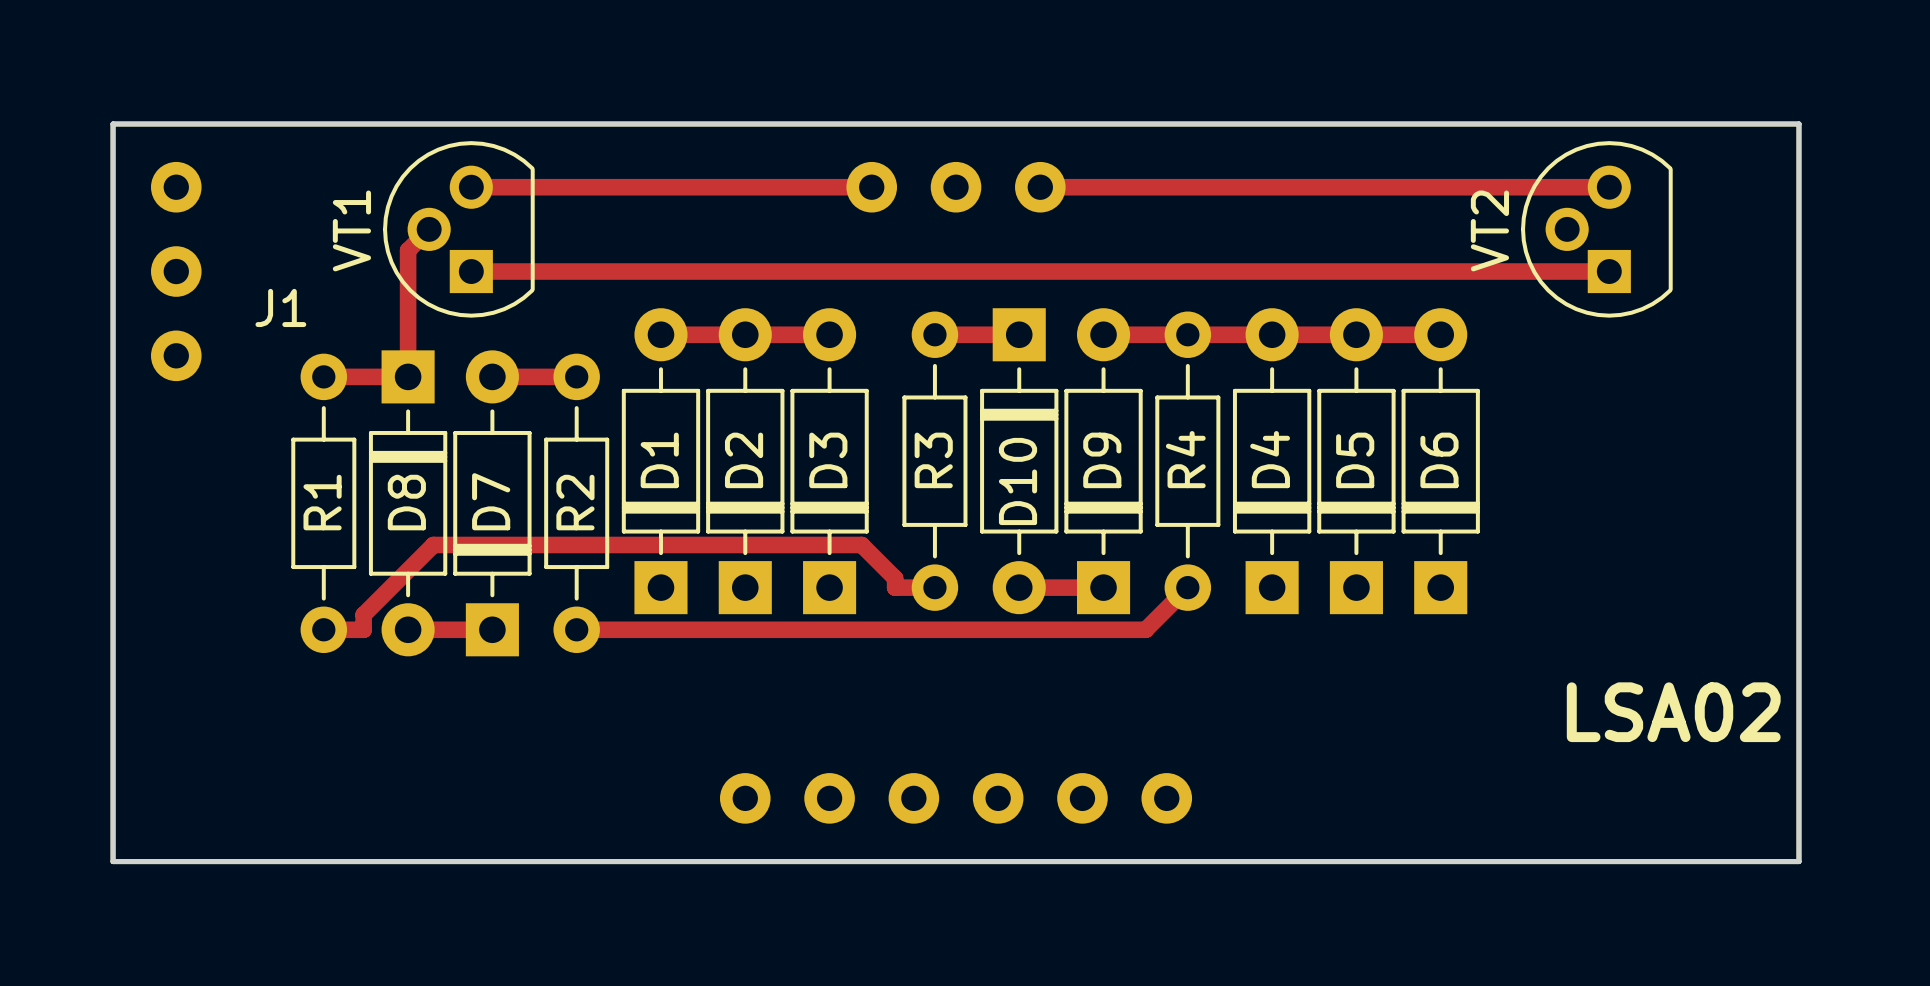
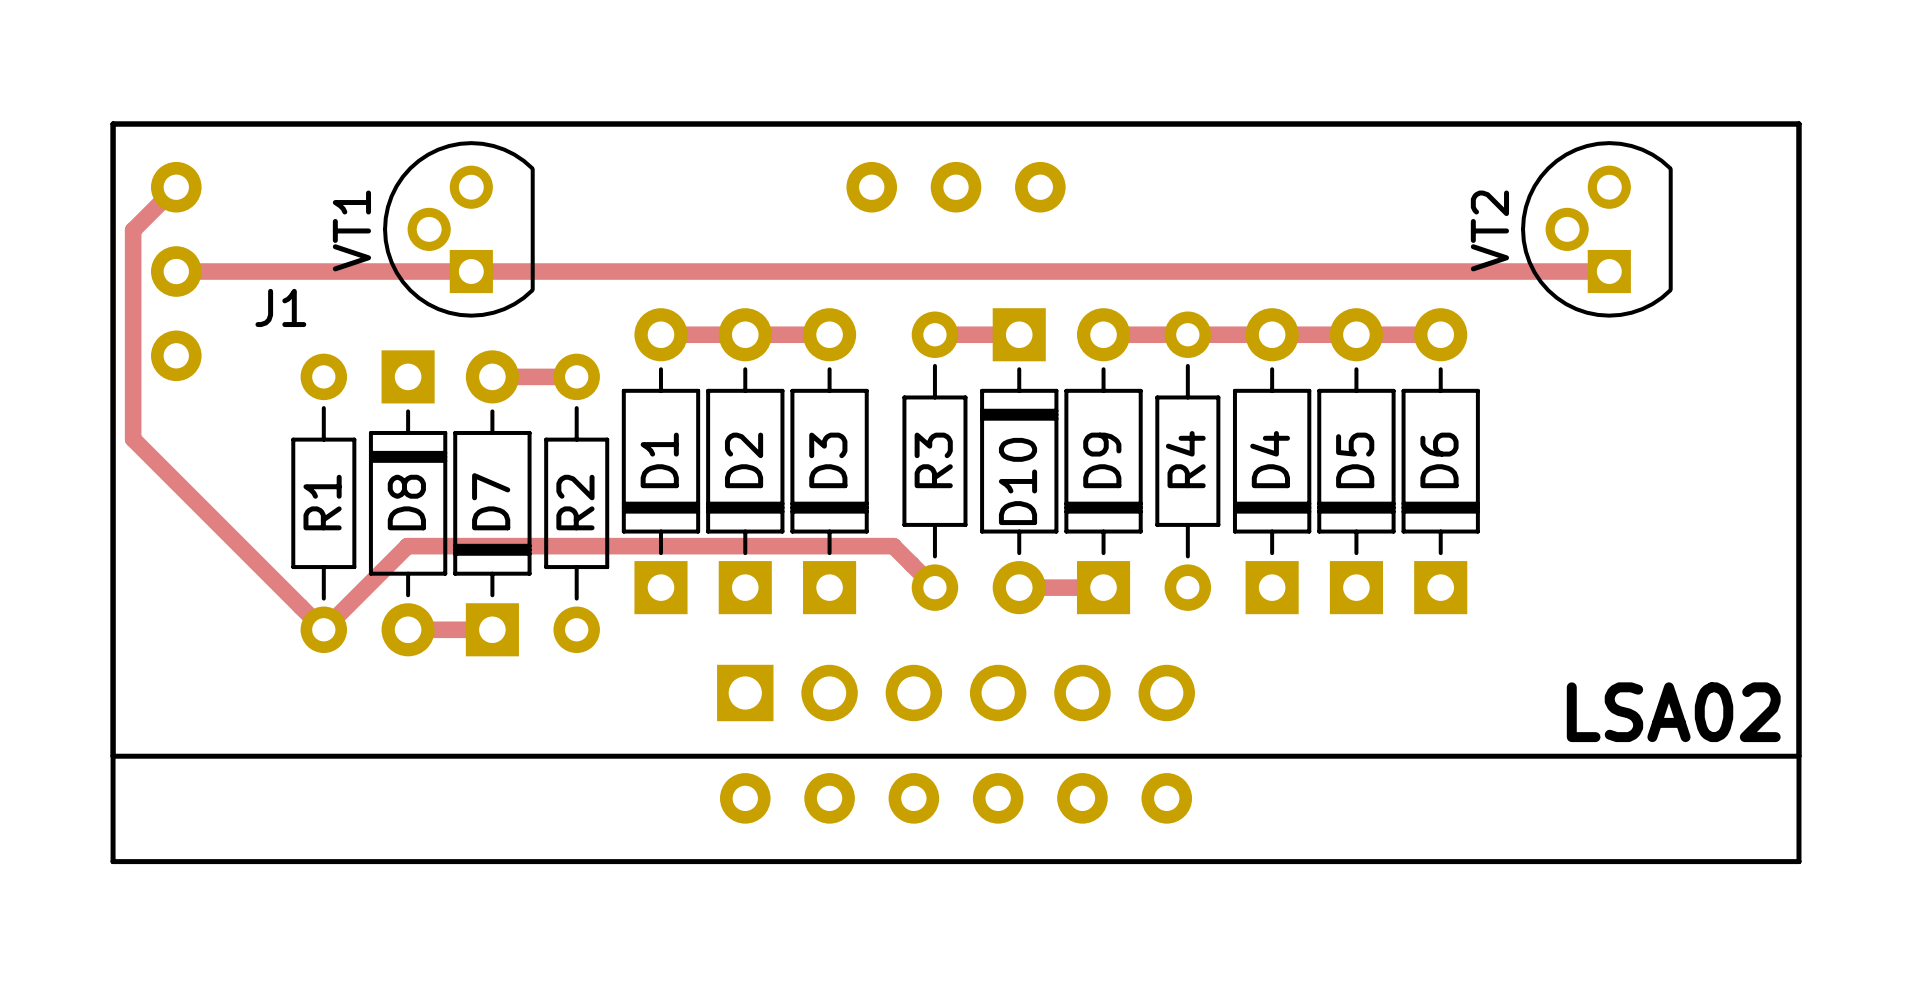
track: (471, 187) (871, 187) -> none
track: (1040, 187) (1609, 187) -> none
track: (429, 229) (408, 250) (408, 376) (323, 376) -> none
track: none -> (176, 271) (471, 271)
track: (934, 587) (895, 587) (895, 578) (861, 544) (433, 544) (363, 614) (363, 629) (323, 629) -> (934, 587) (893, 546) (407, 546) (323, 629) (133, 439) (133, 230) (176, 187)
track: (1187, 587) (1145, 629) (576, 629) -> none
part: none -> (956, 693)
board edge: (113, 756) (113, 861) (1798, 861) (1798, 756) -> (113, 756) (1798, 756)

